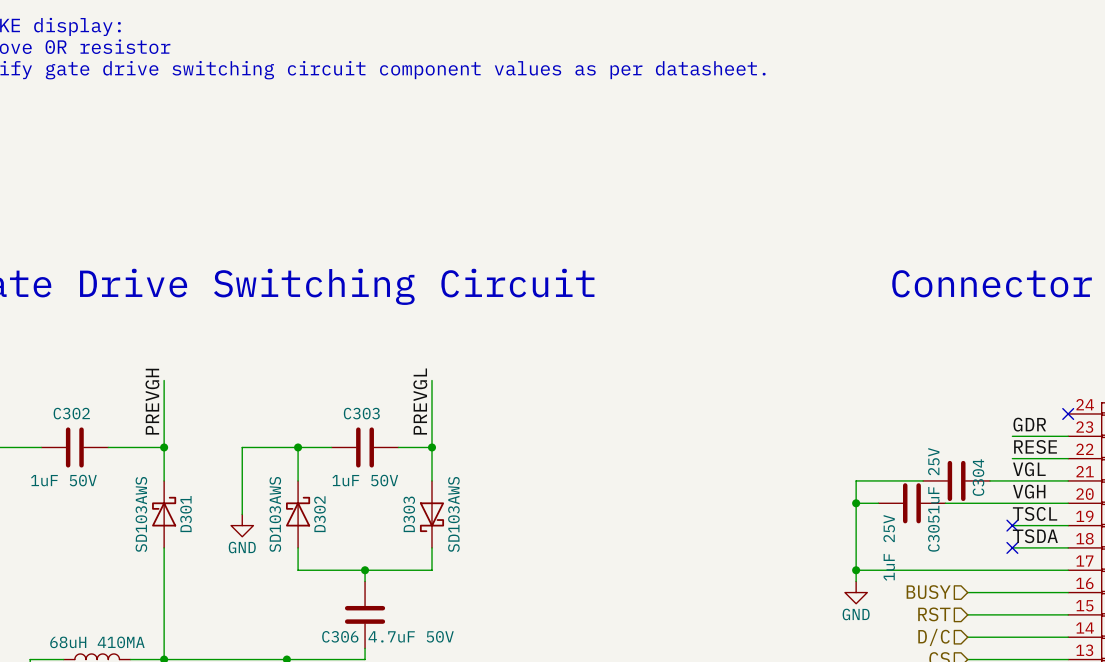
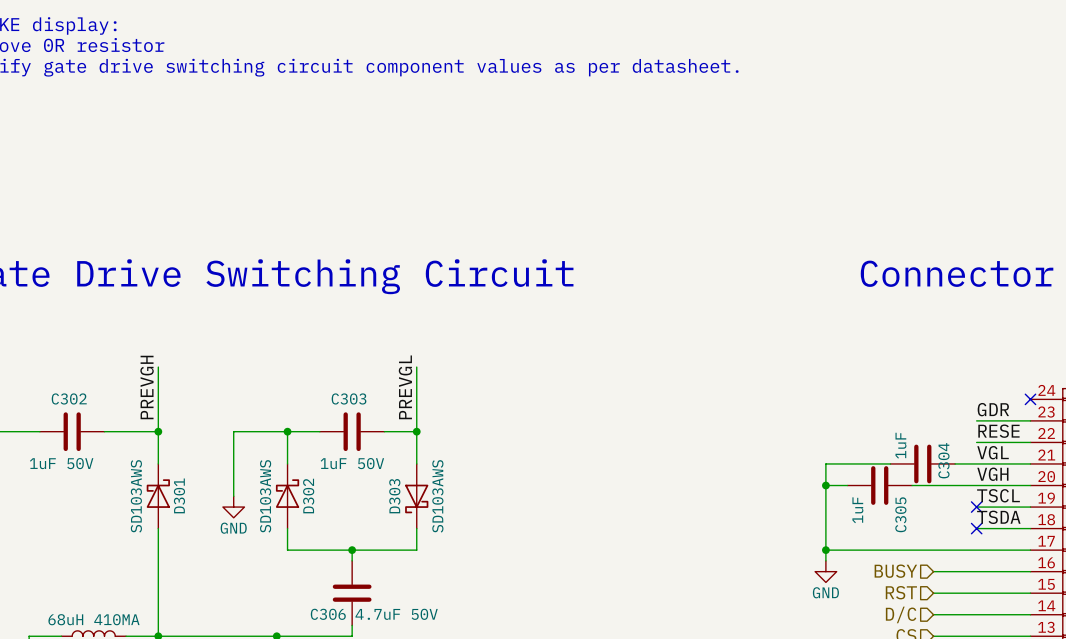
C304 value: 1uF 25V (933, 480) -> 1uF (900, 445)
C305 value: 1uF 25V (889, 547) -> 1uF (857, 510)

